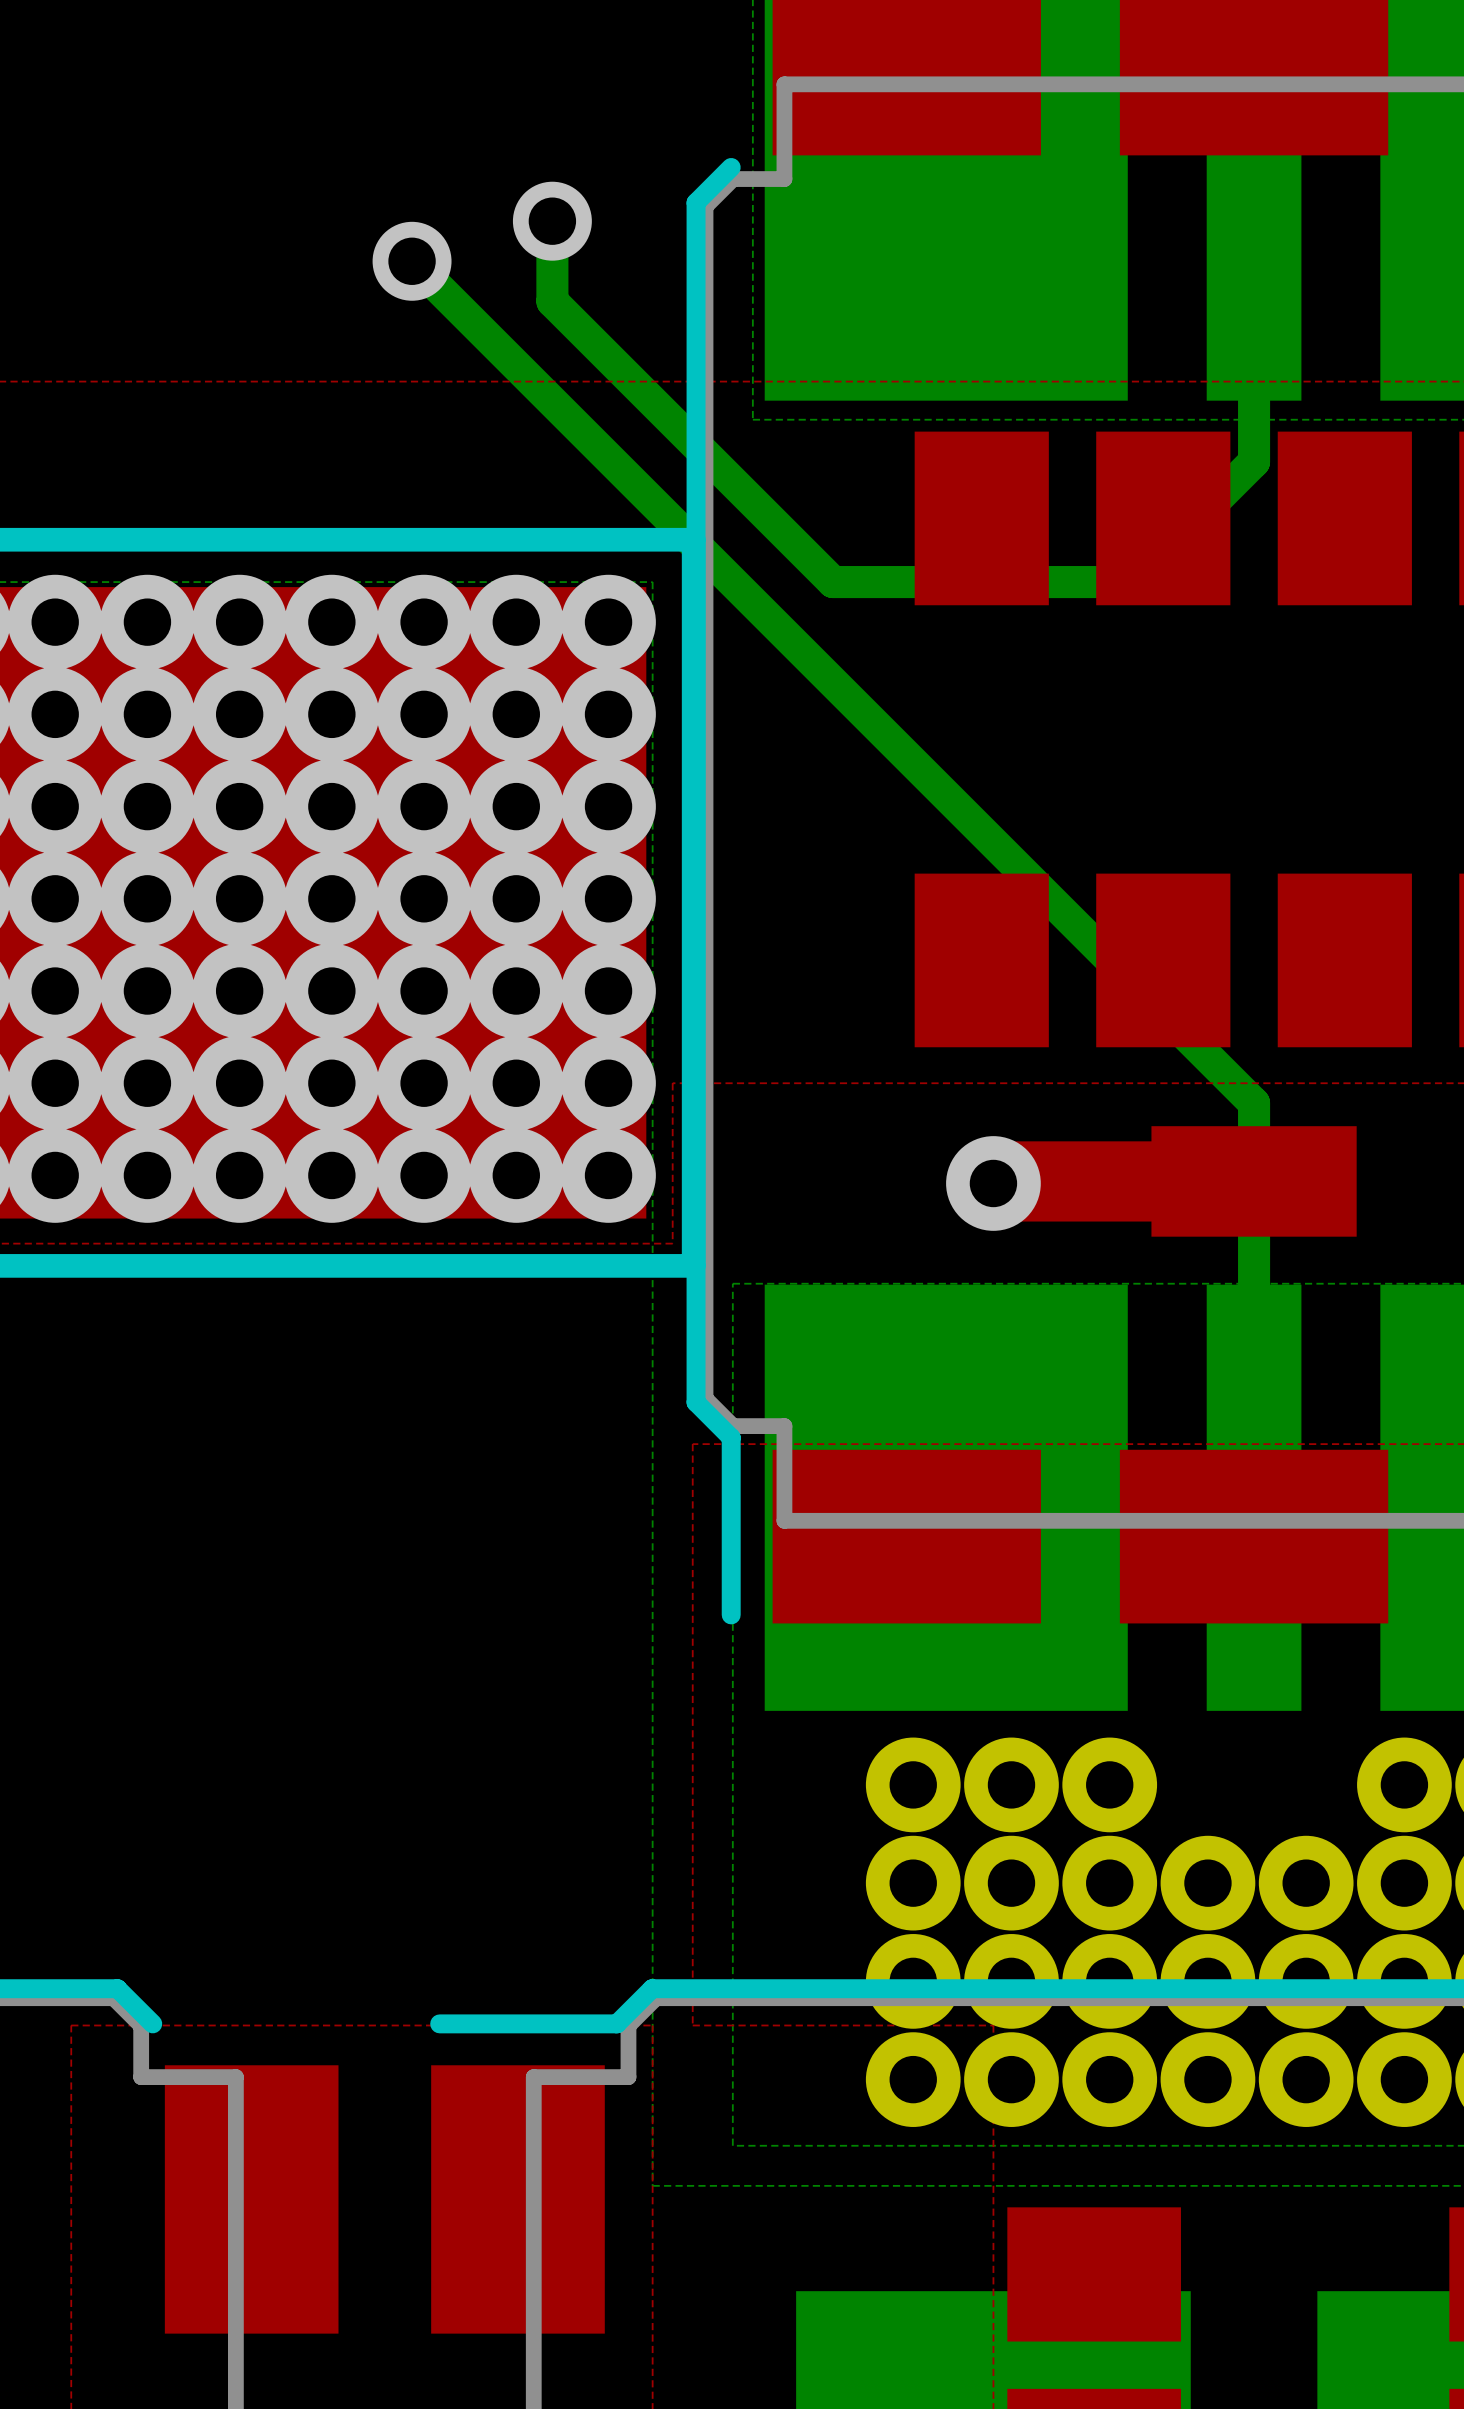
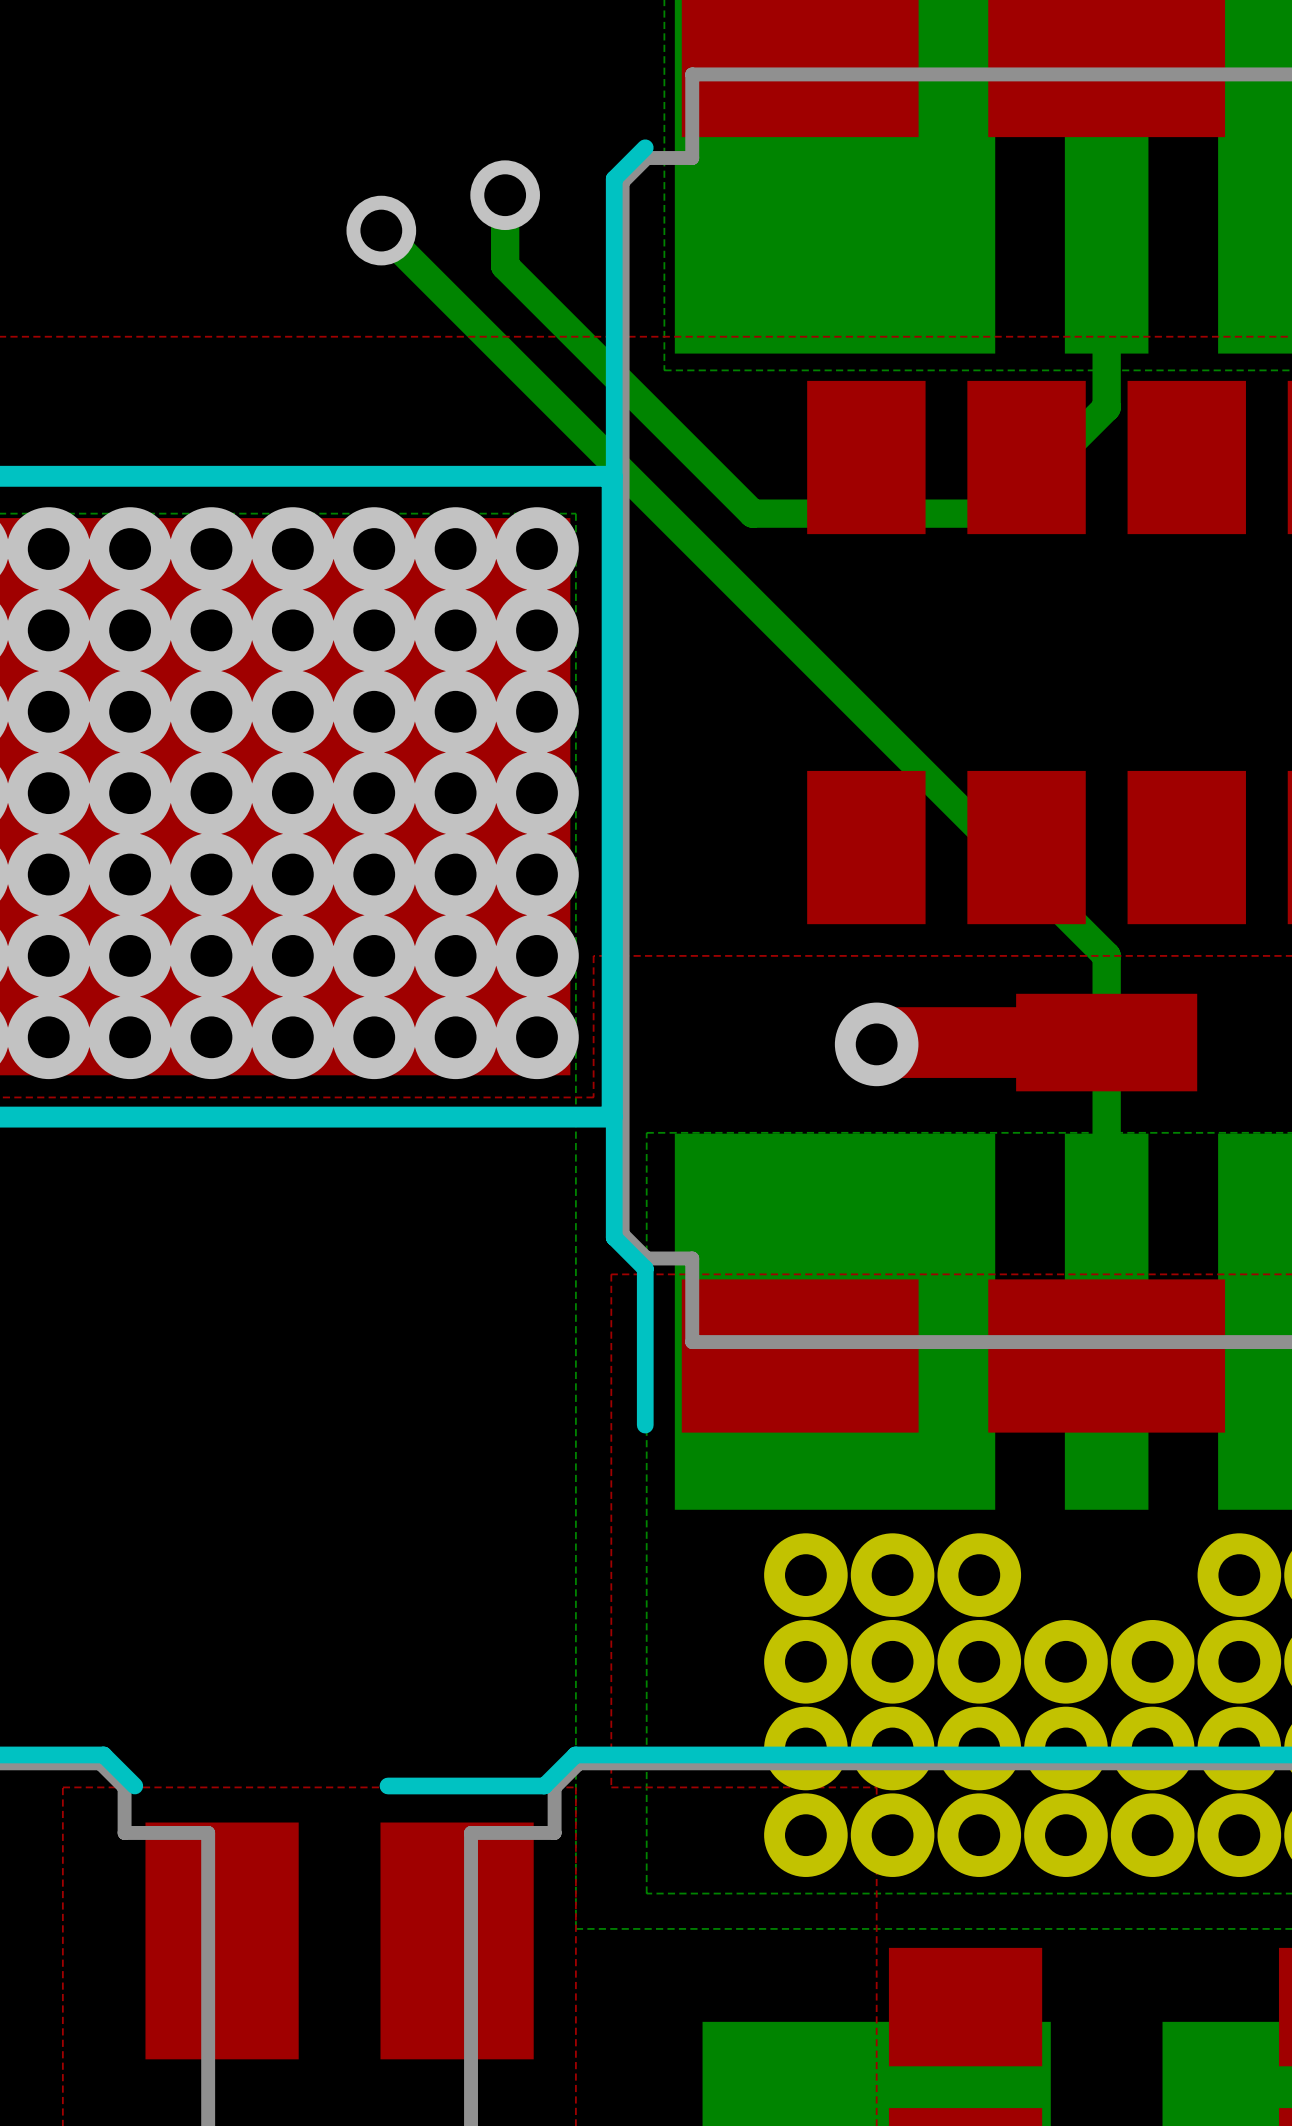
bottom track: (552, 221) (552, 301) (833, 582) (853, 582) -> (505, 195) (505, 265) (752, 513)
via position: (552, 221) -> (505, 195)
bottom track: (412, 261) (1254, 1103) -> (381, 230) (1106, 955) (1106, 973)
via position: (412, 261) -> (381, 230)

